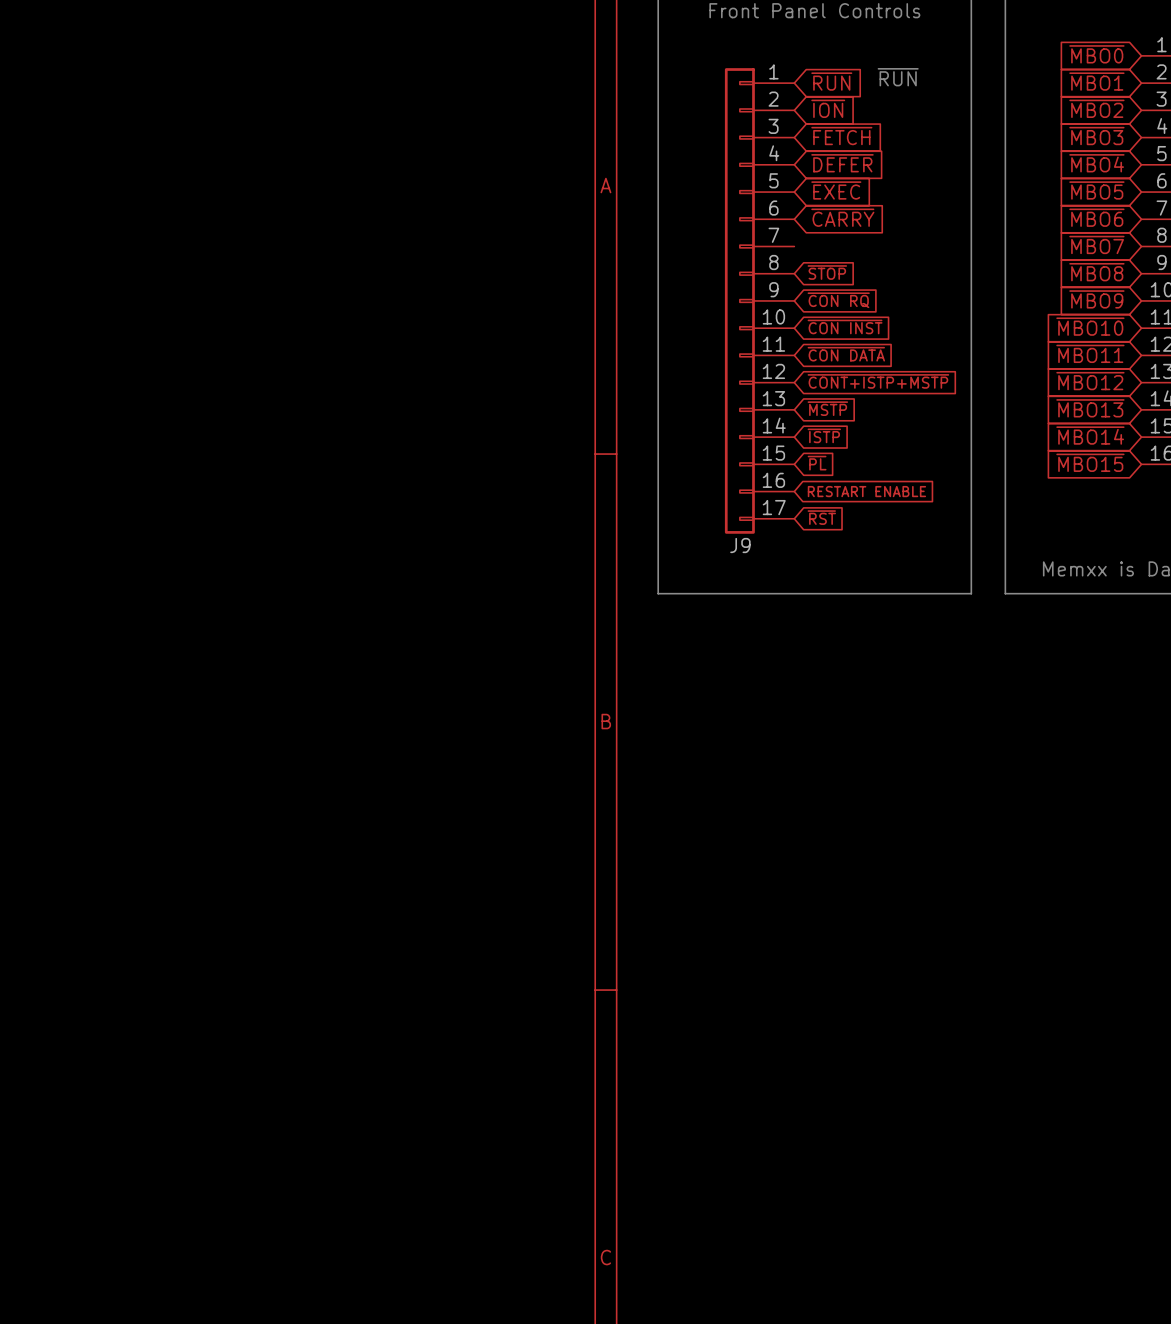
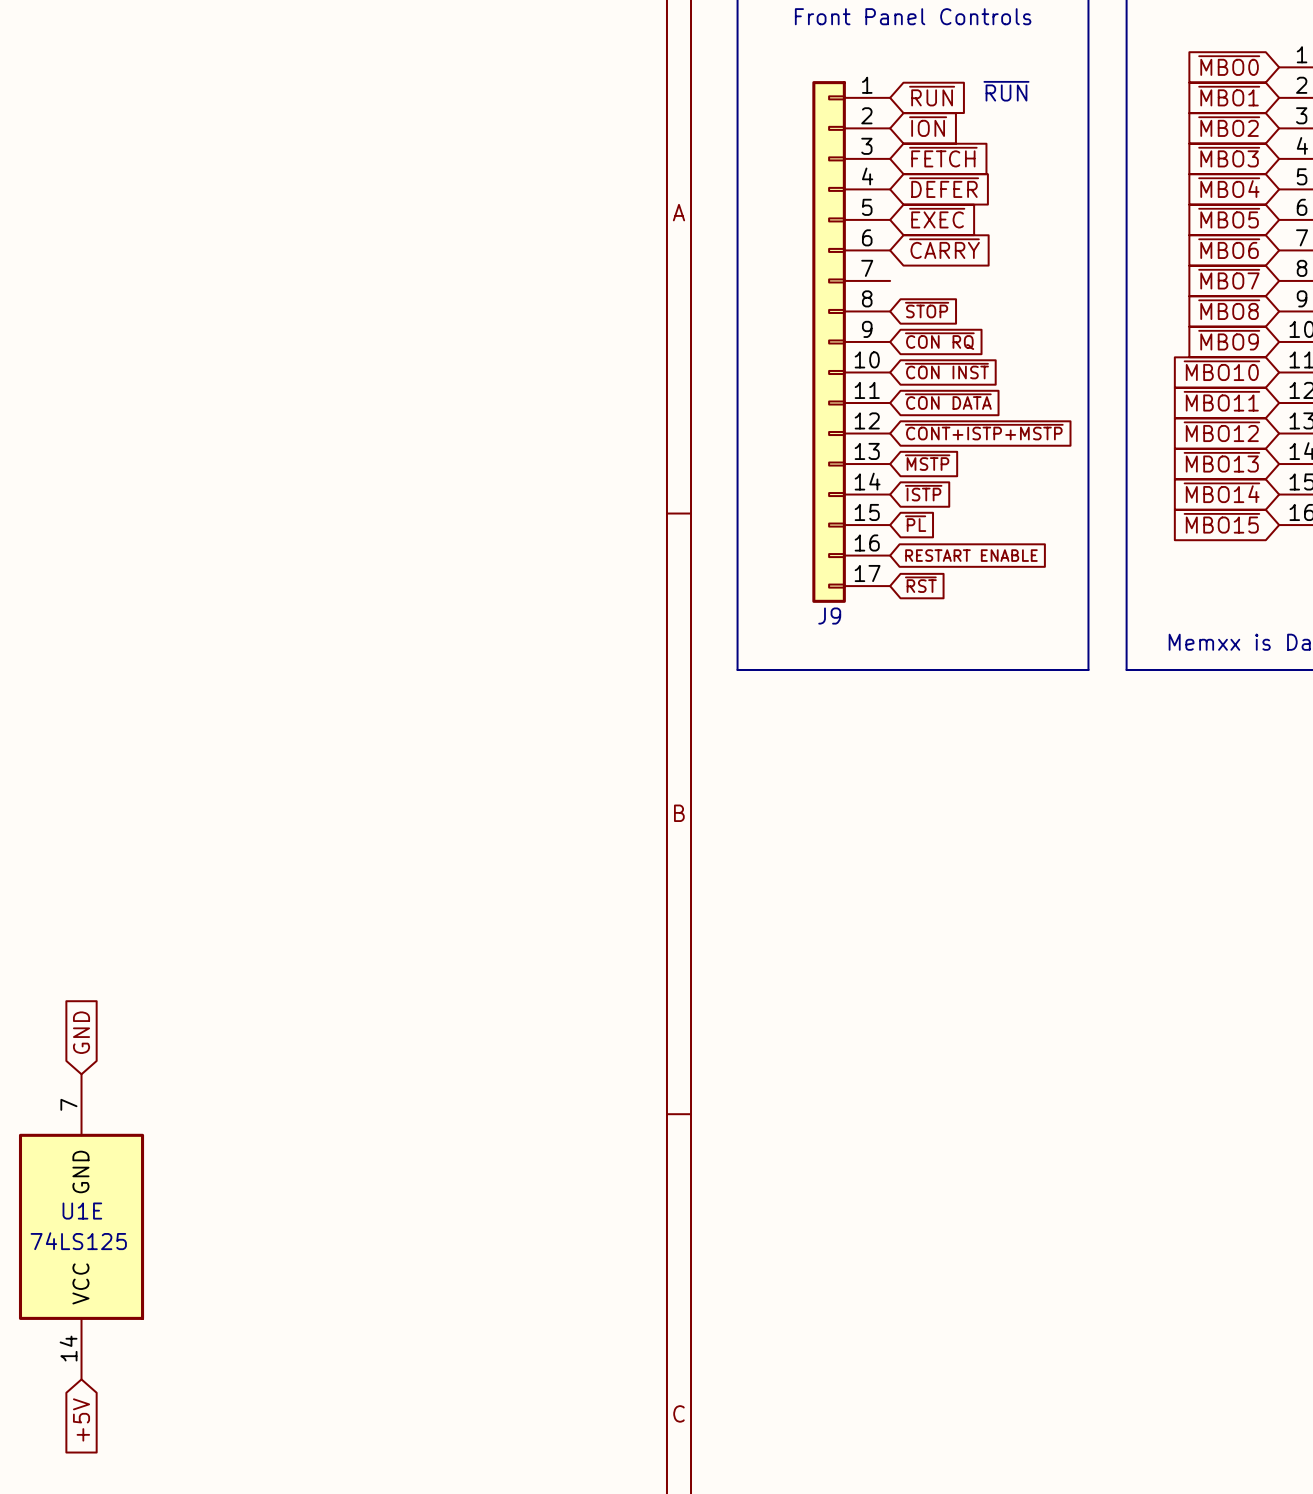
global label: none -> GND (81, 1032)
U1E: none -> 74LS125 (81, 1226)
global label: none -> +5V (81, 1419)

